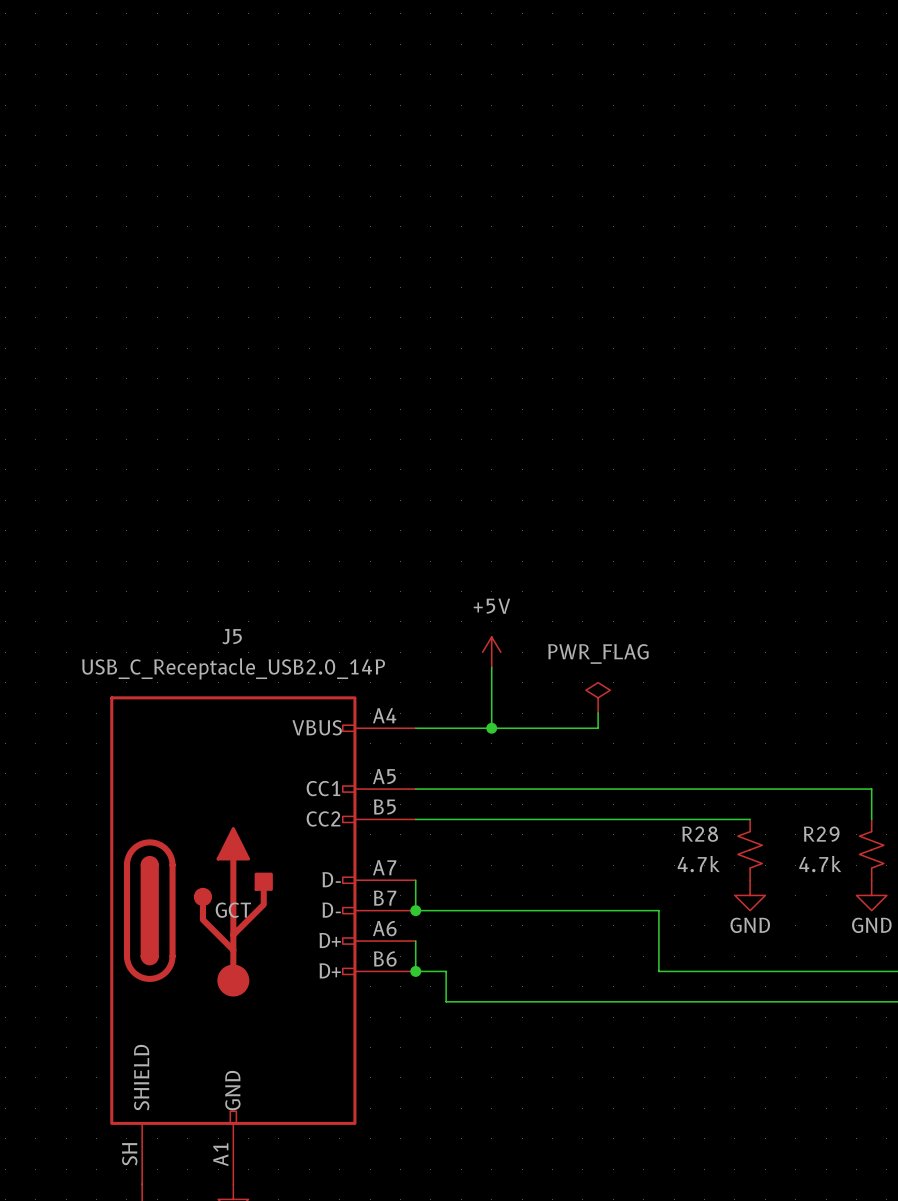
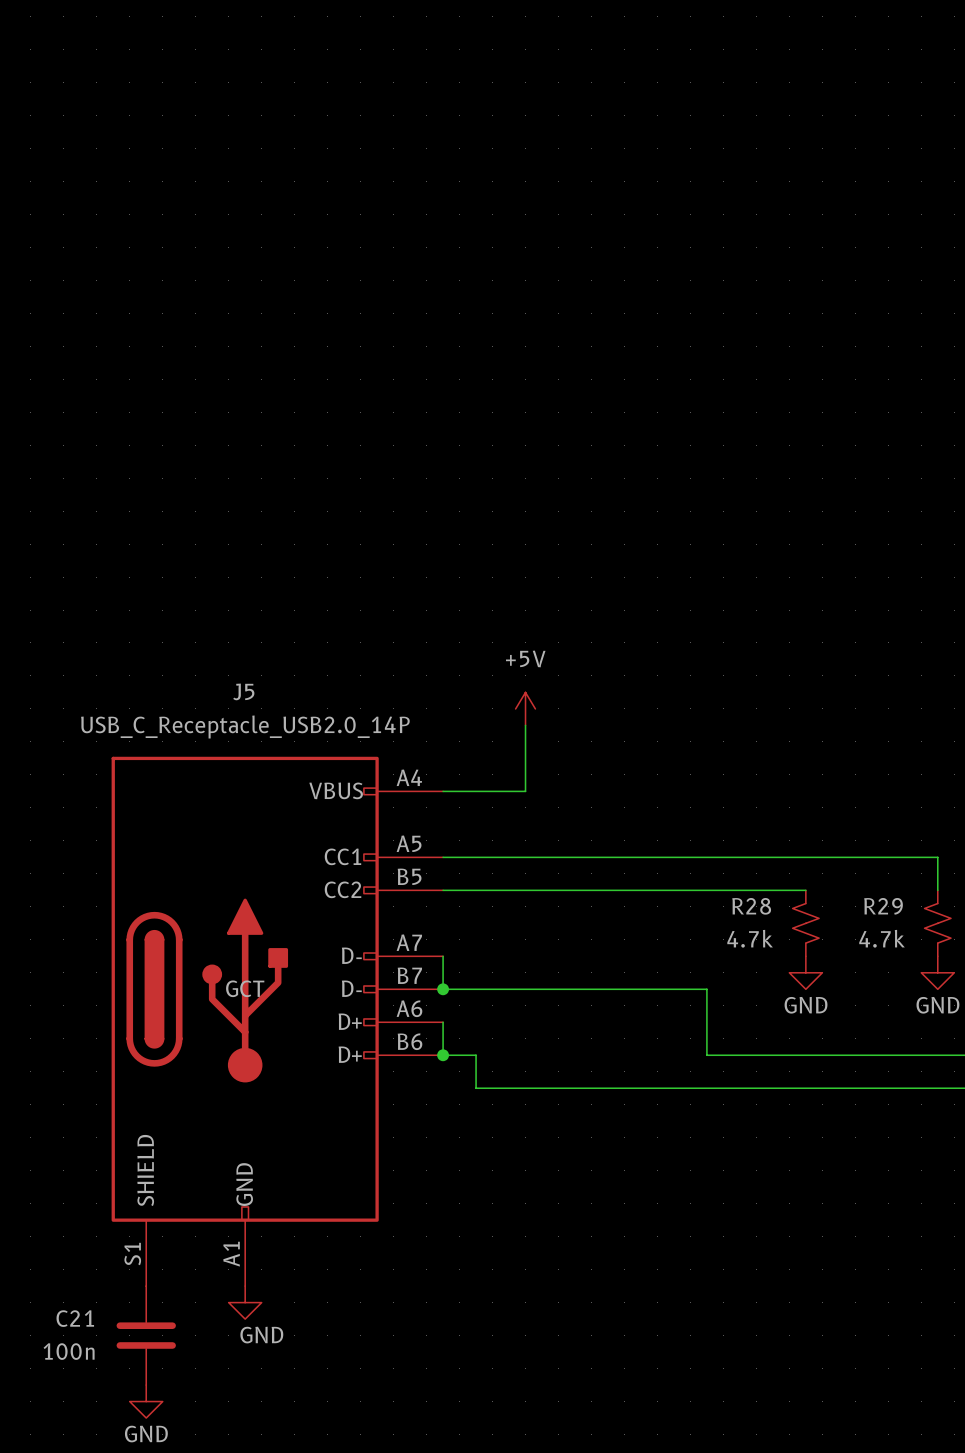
power symbol: PWR_FLAG (598, 697) -> none
wire: (598, 713) (598, 728) (491, 728) -> none
junction: (491, 728) -> none
J5 pin number: SH (129, 1154) -> S1 (132, 1254)

